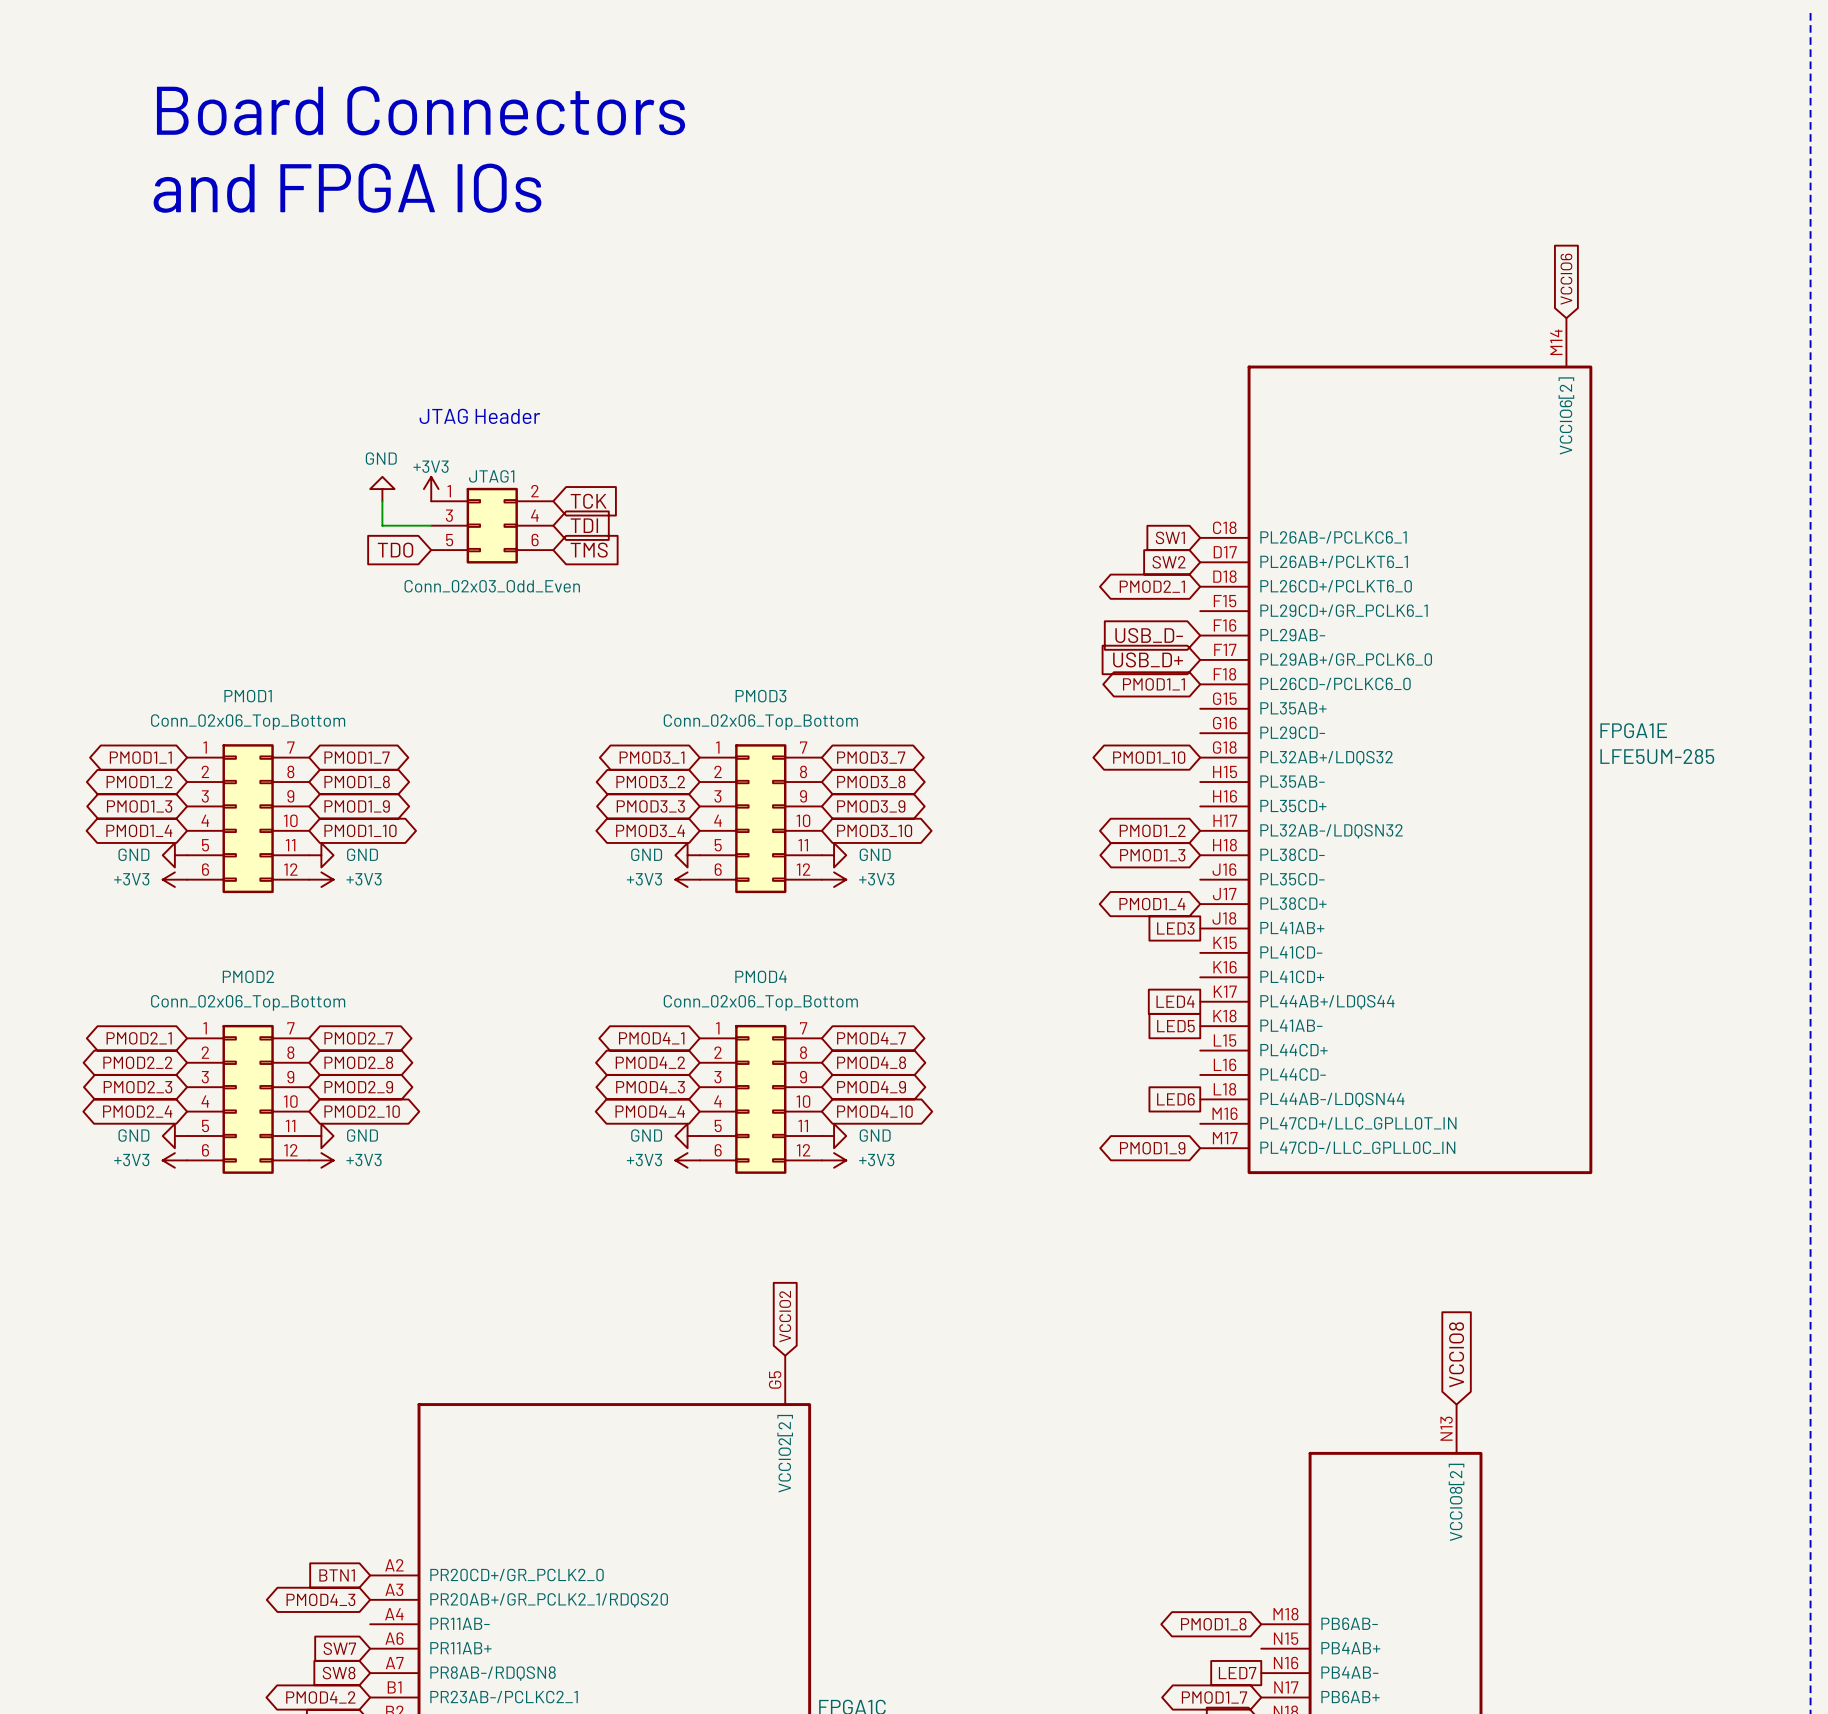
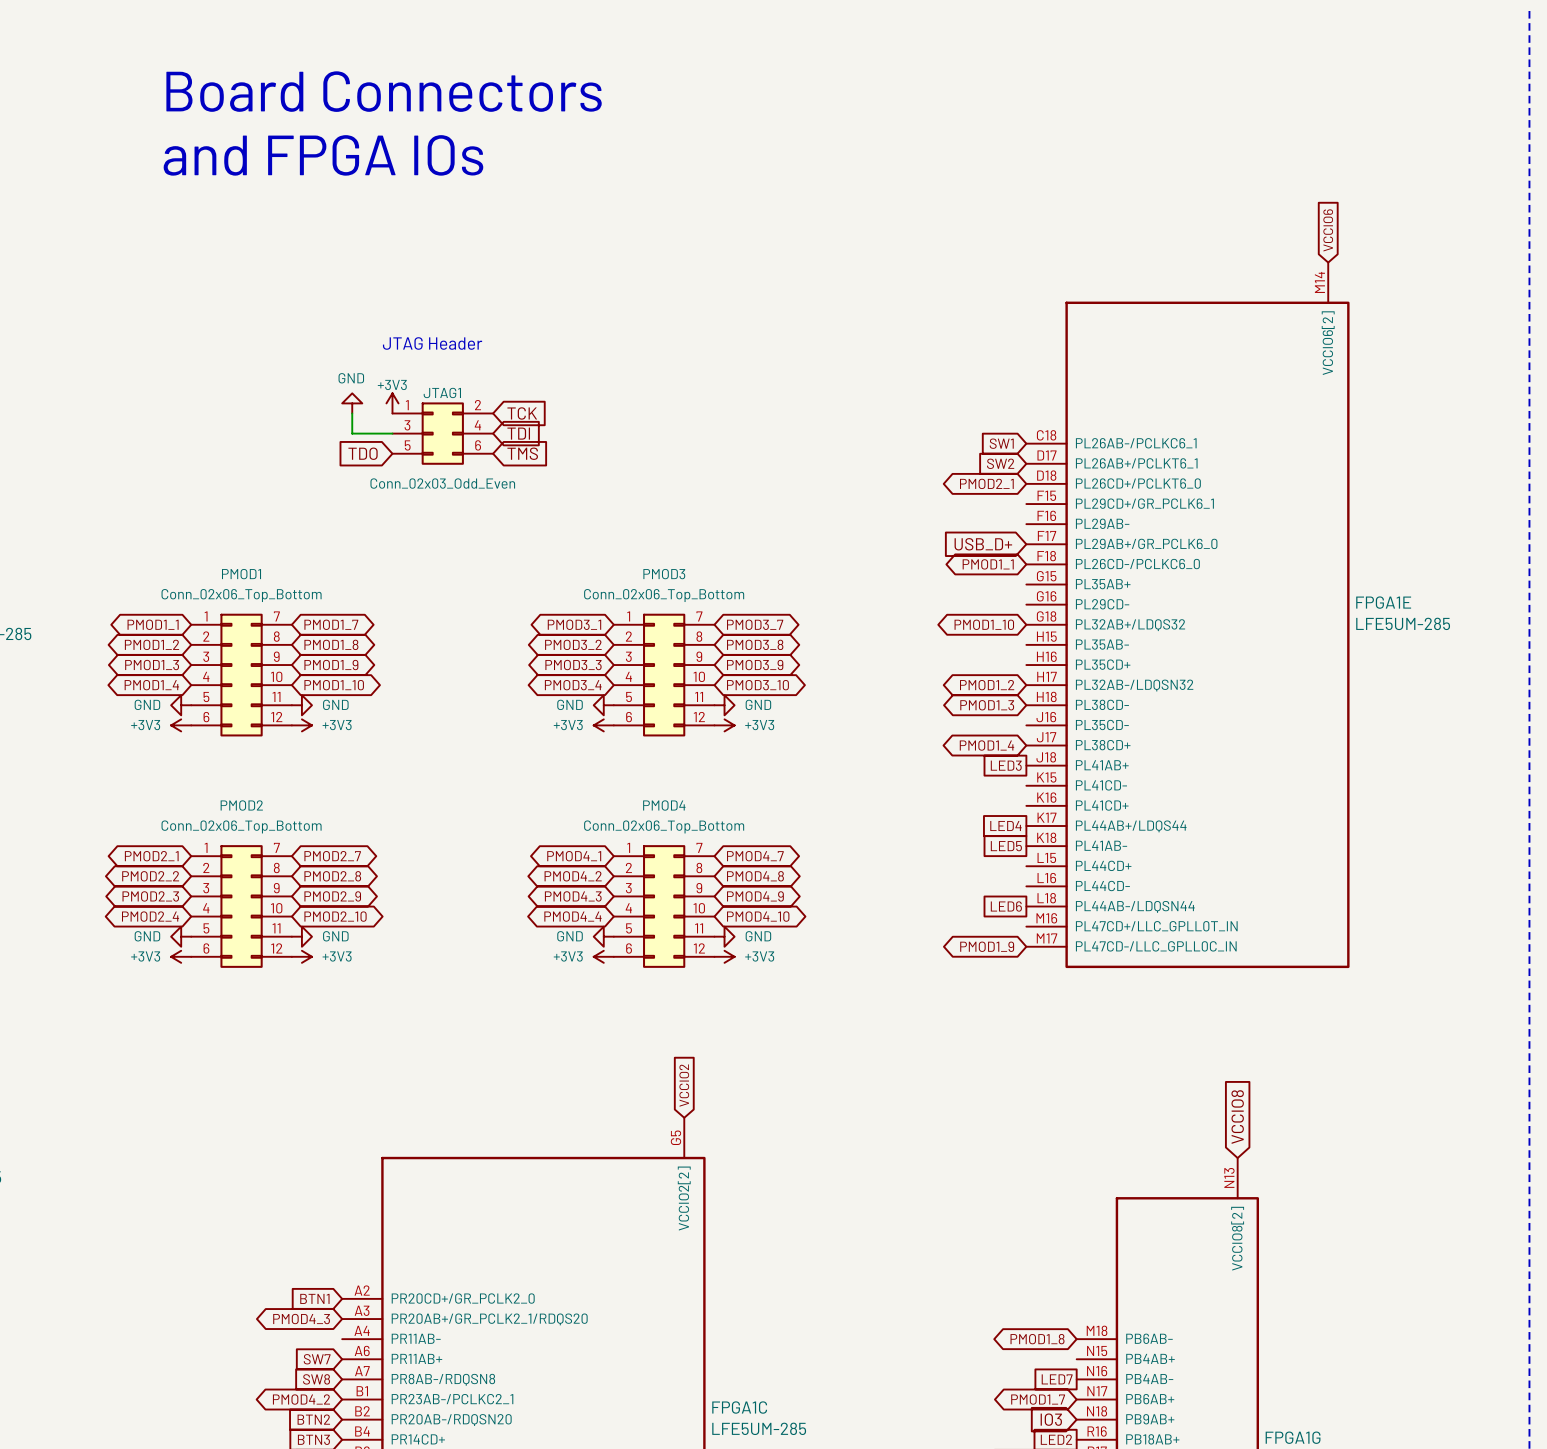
global label: USB_D- (1149, 635) -> none

